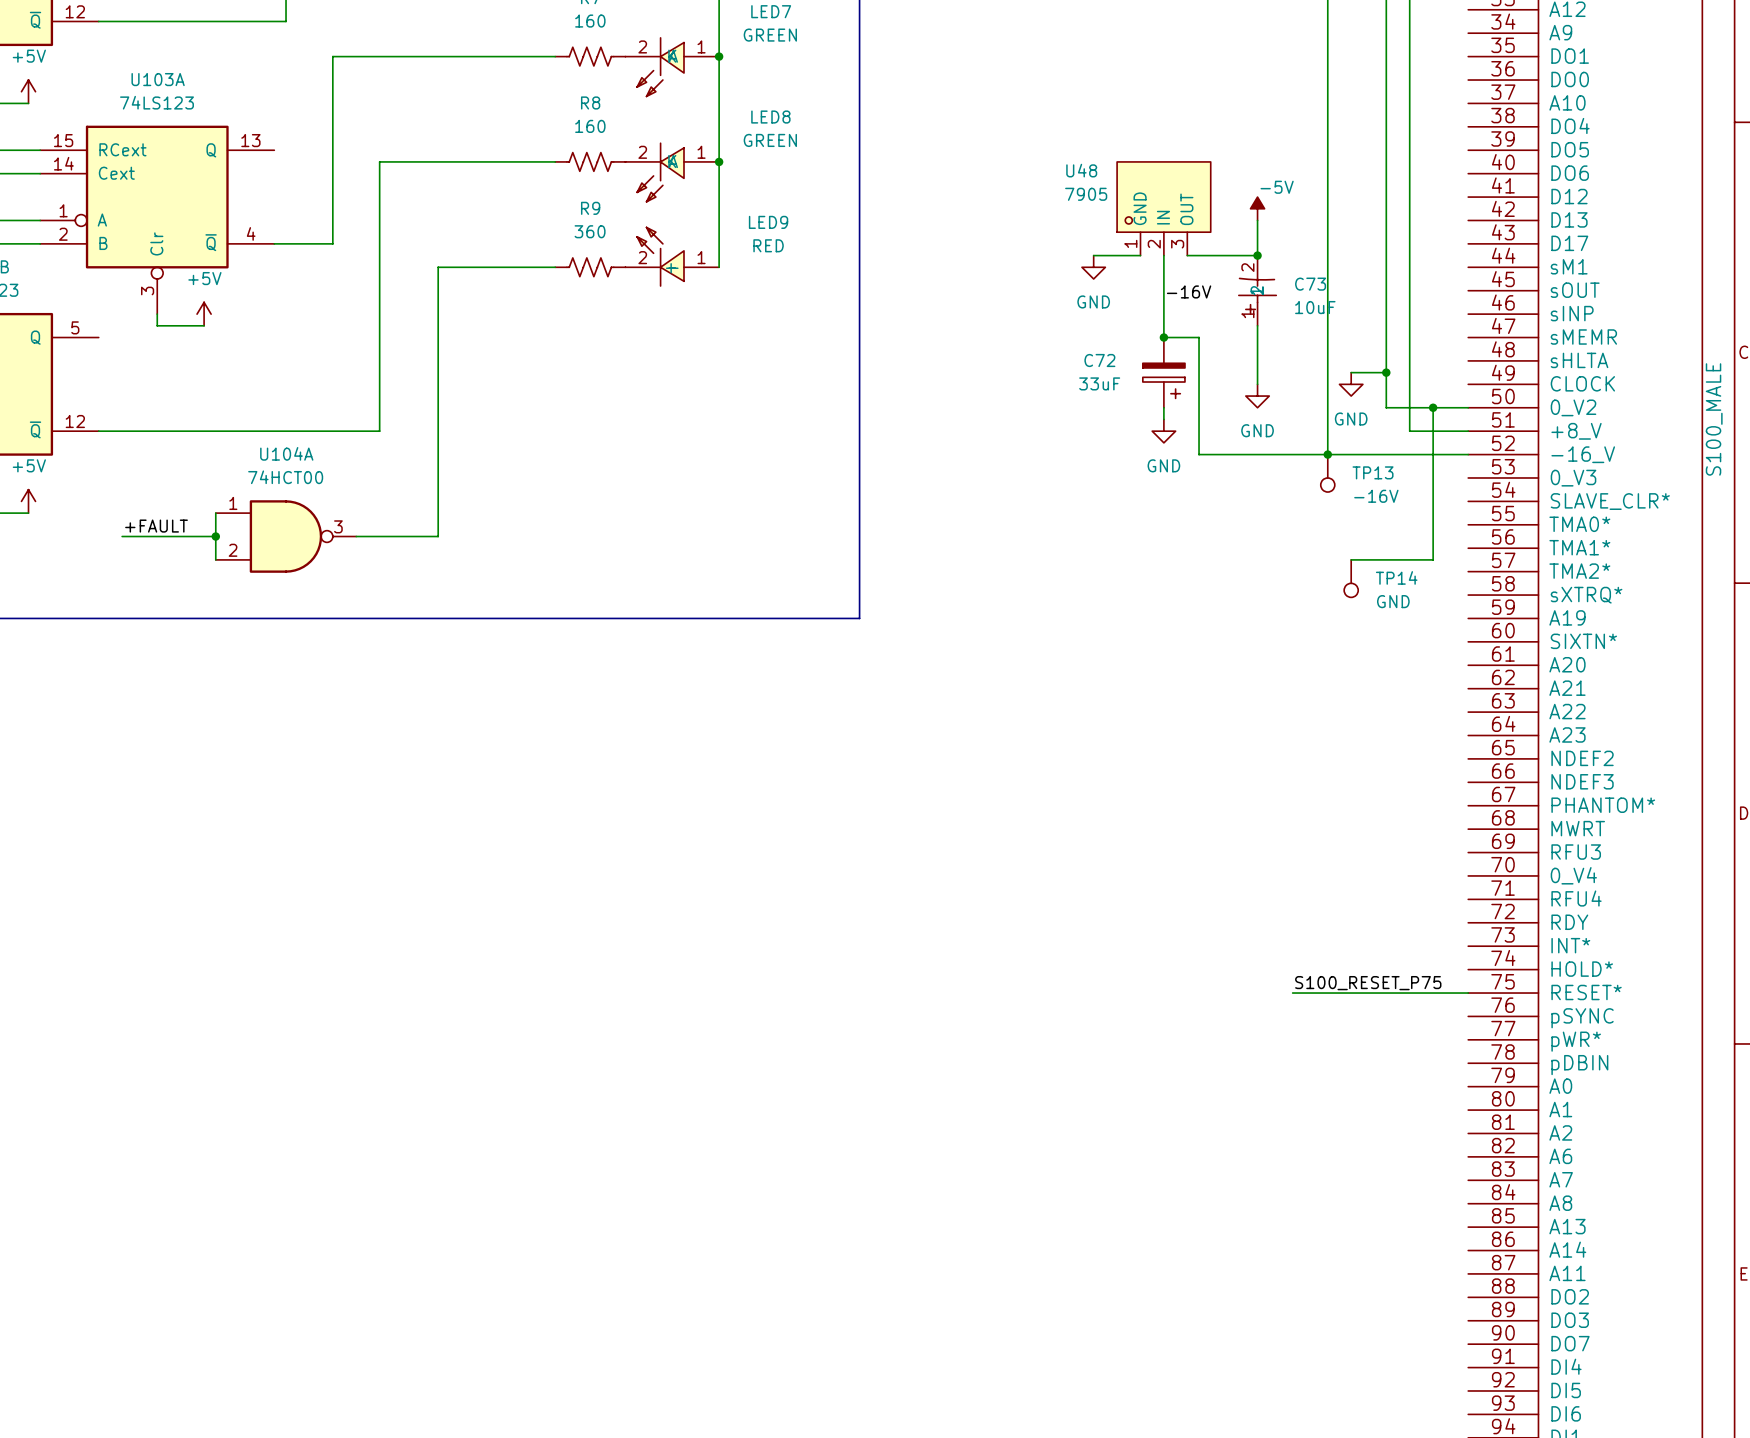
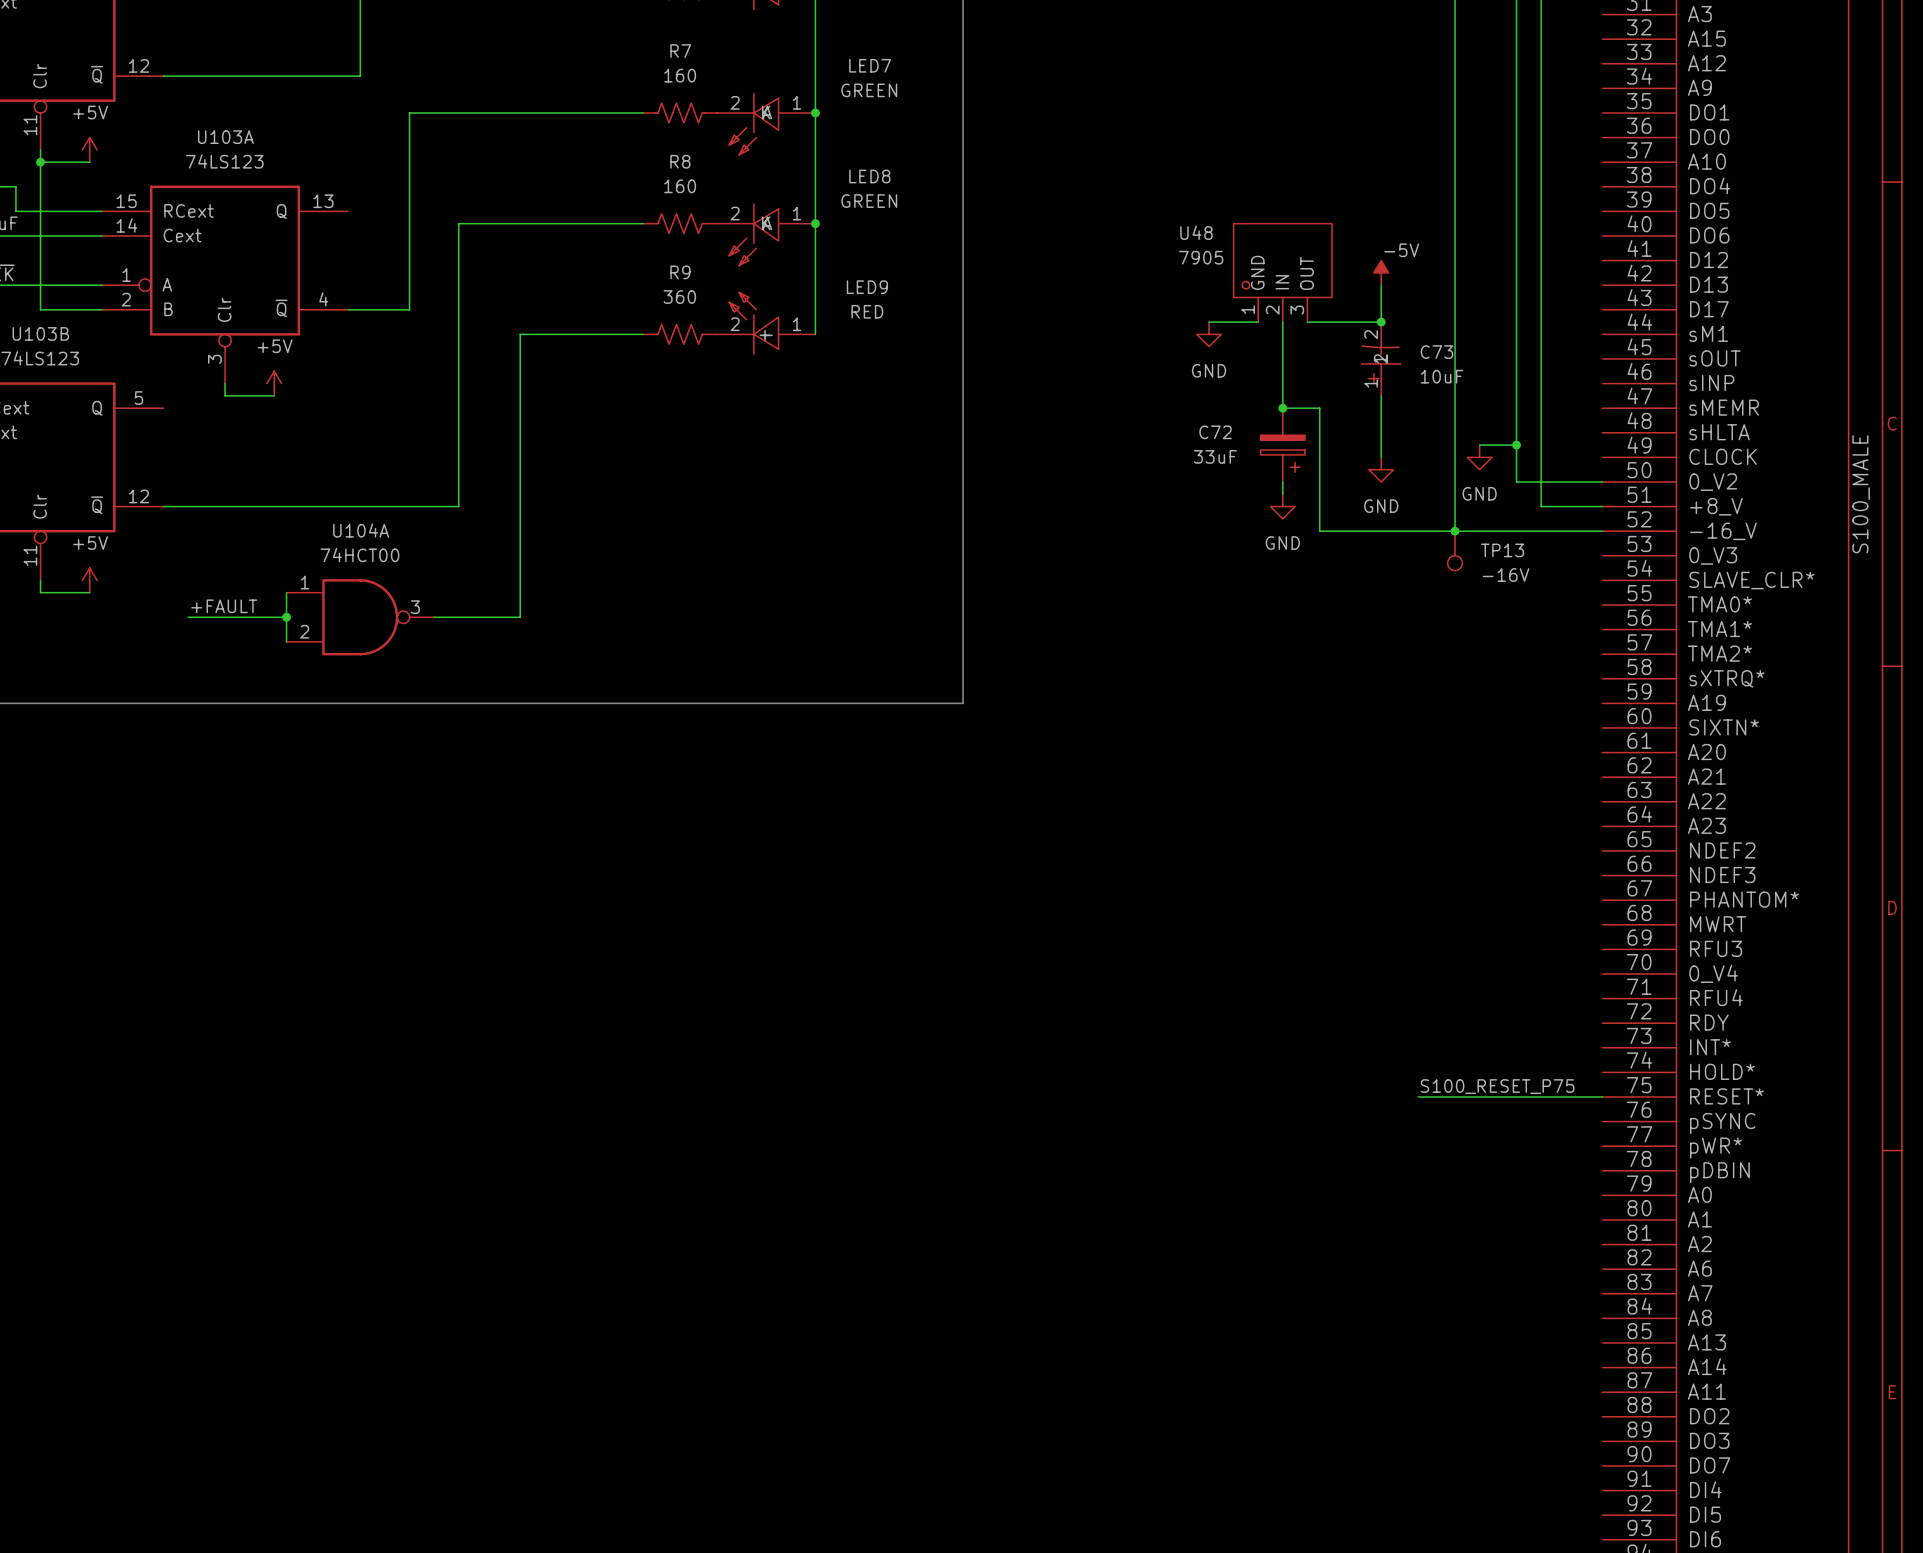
label: -16V (1189, 291) -> none
wire: (1433, 407) (1433, 559) (1351, 559) -> none
junction: (1433, 407) -> none
TP14: GND (1351, 578) -> none

